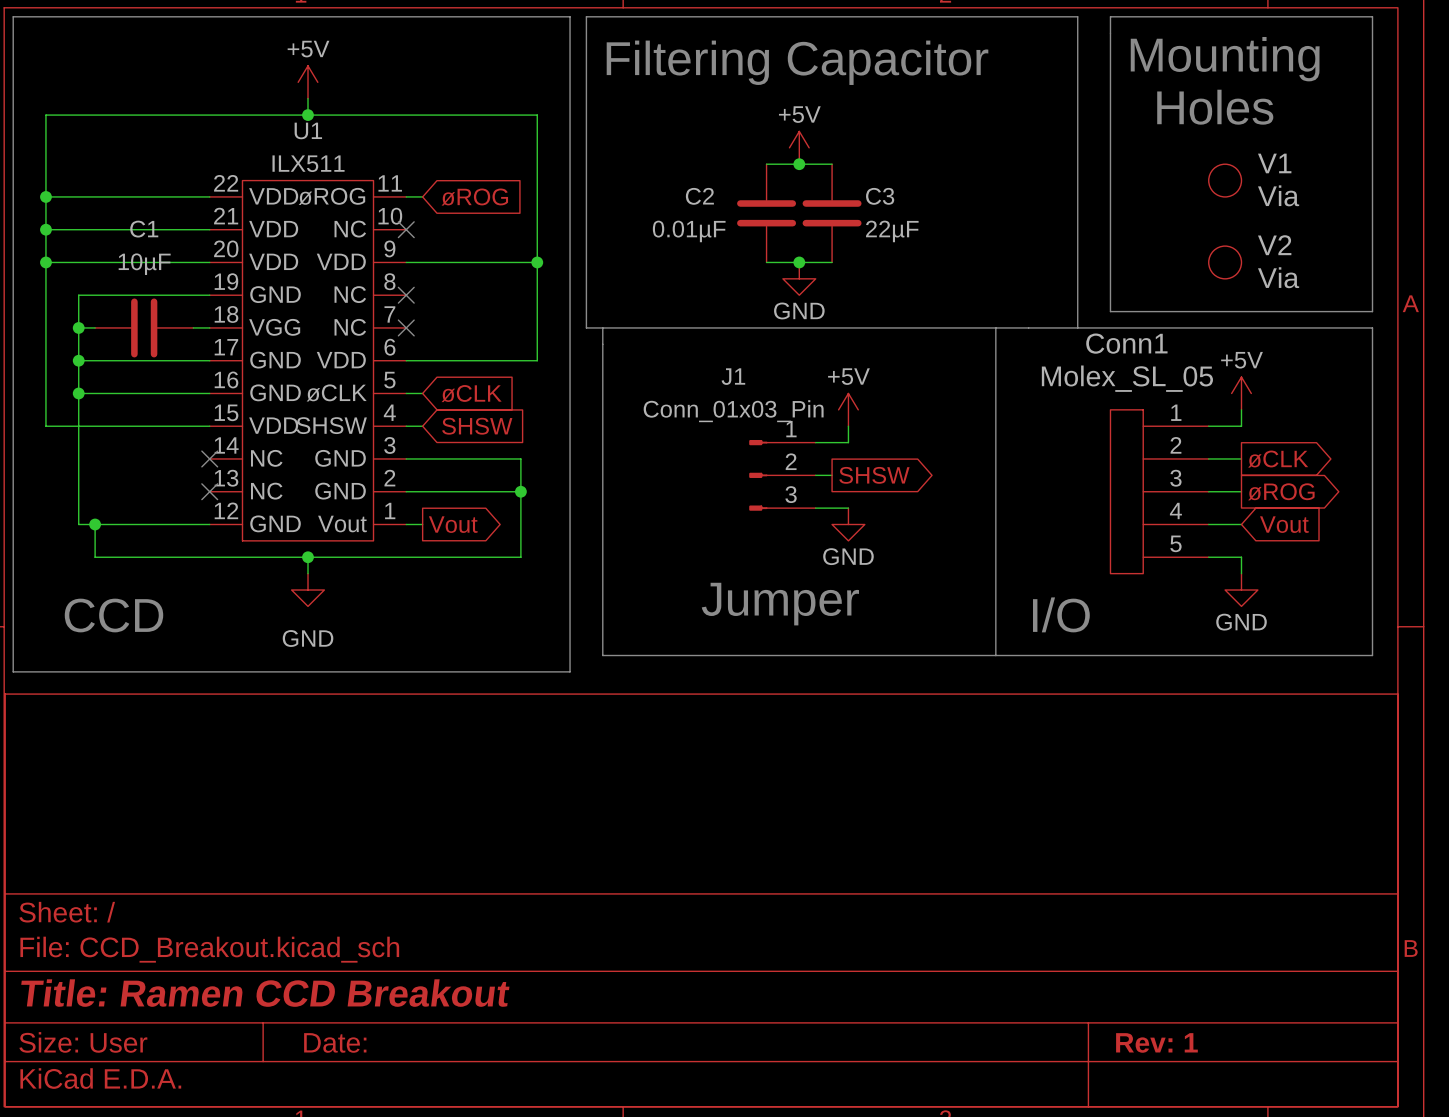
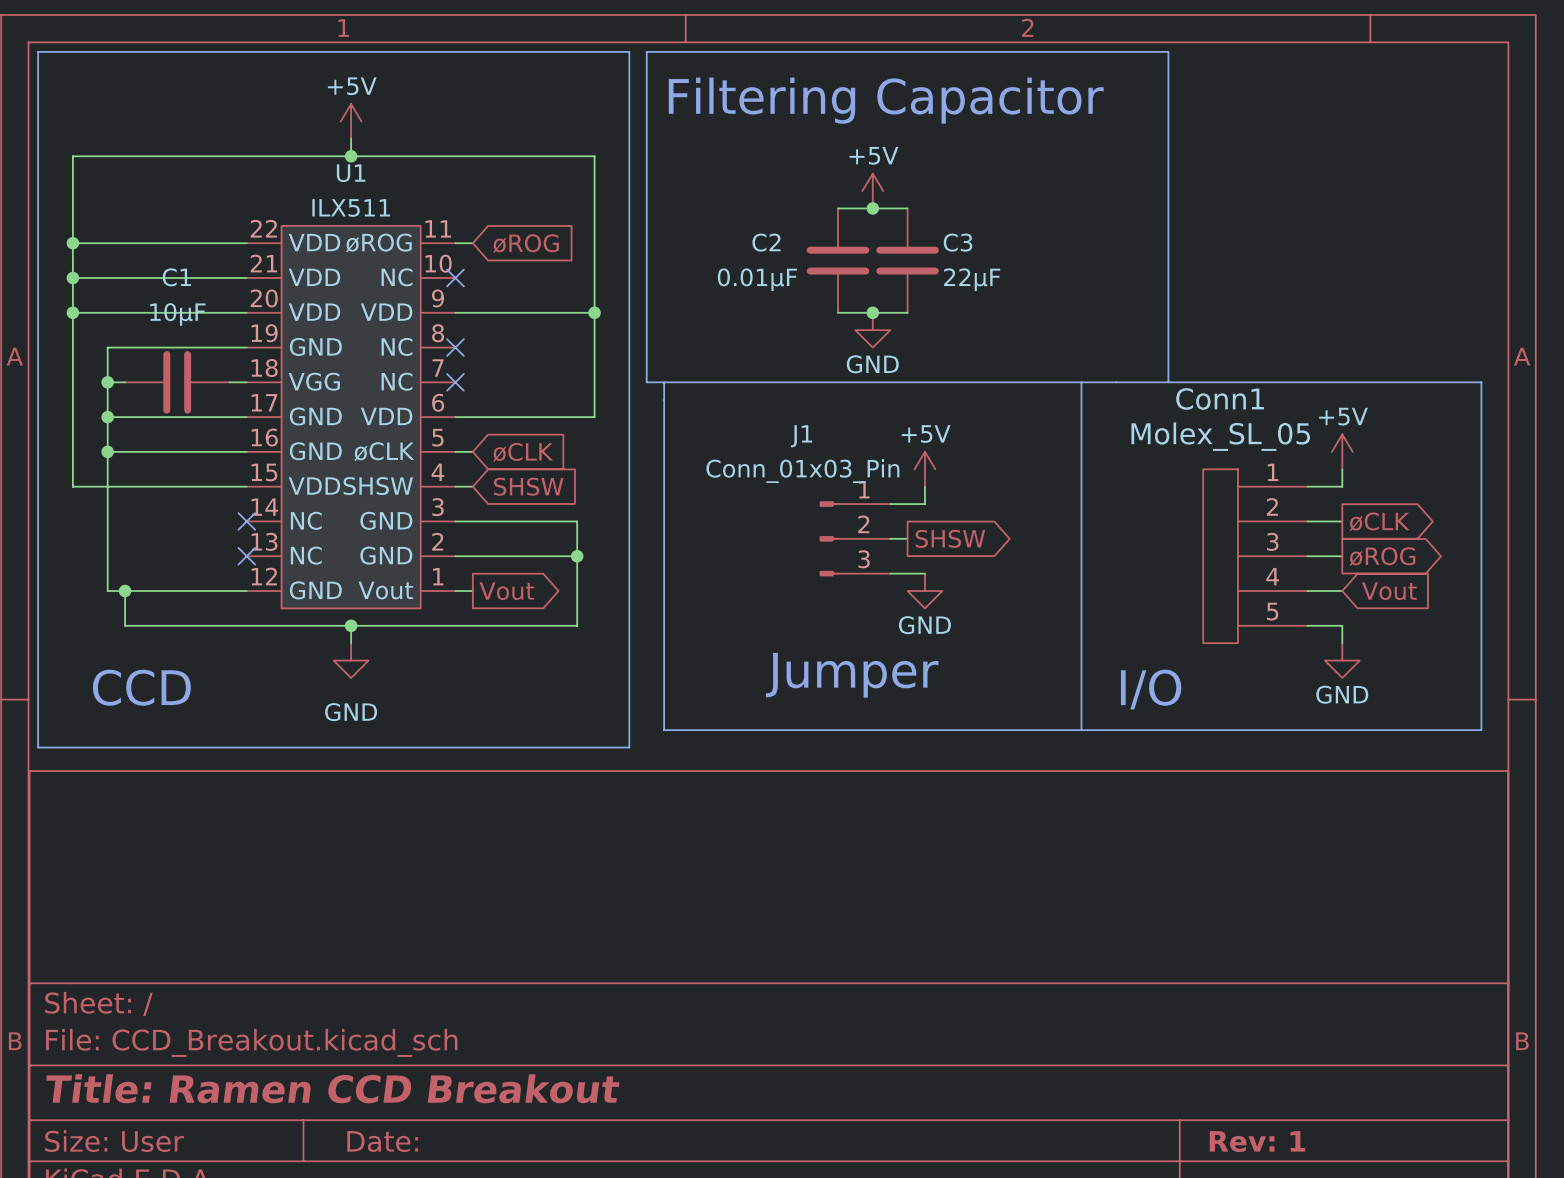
line: (1110, 16) (1372, 16) (1372, 311) (1110, 311) (1110, 16) -> none
text: Mounting (1225, 59) -> none
text: Holes (1215, 107) -> none
V1: Via (1225, 180) -> none
V2: Via (1225, 262) -> none

